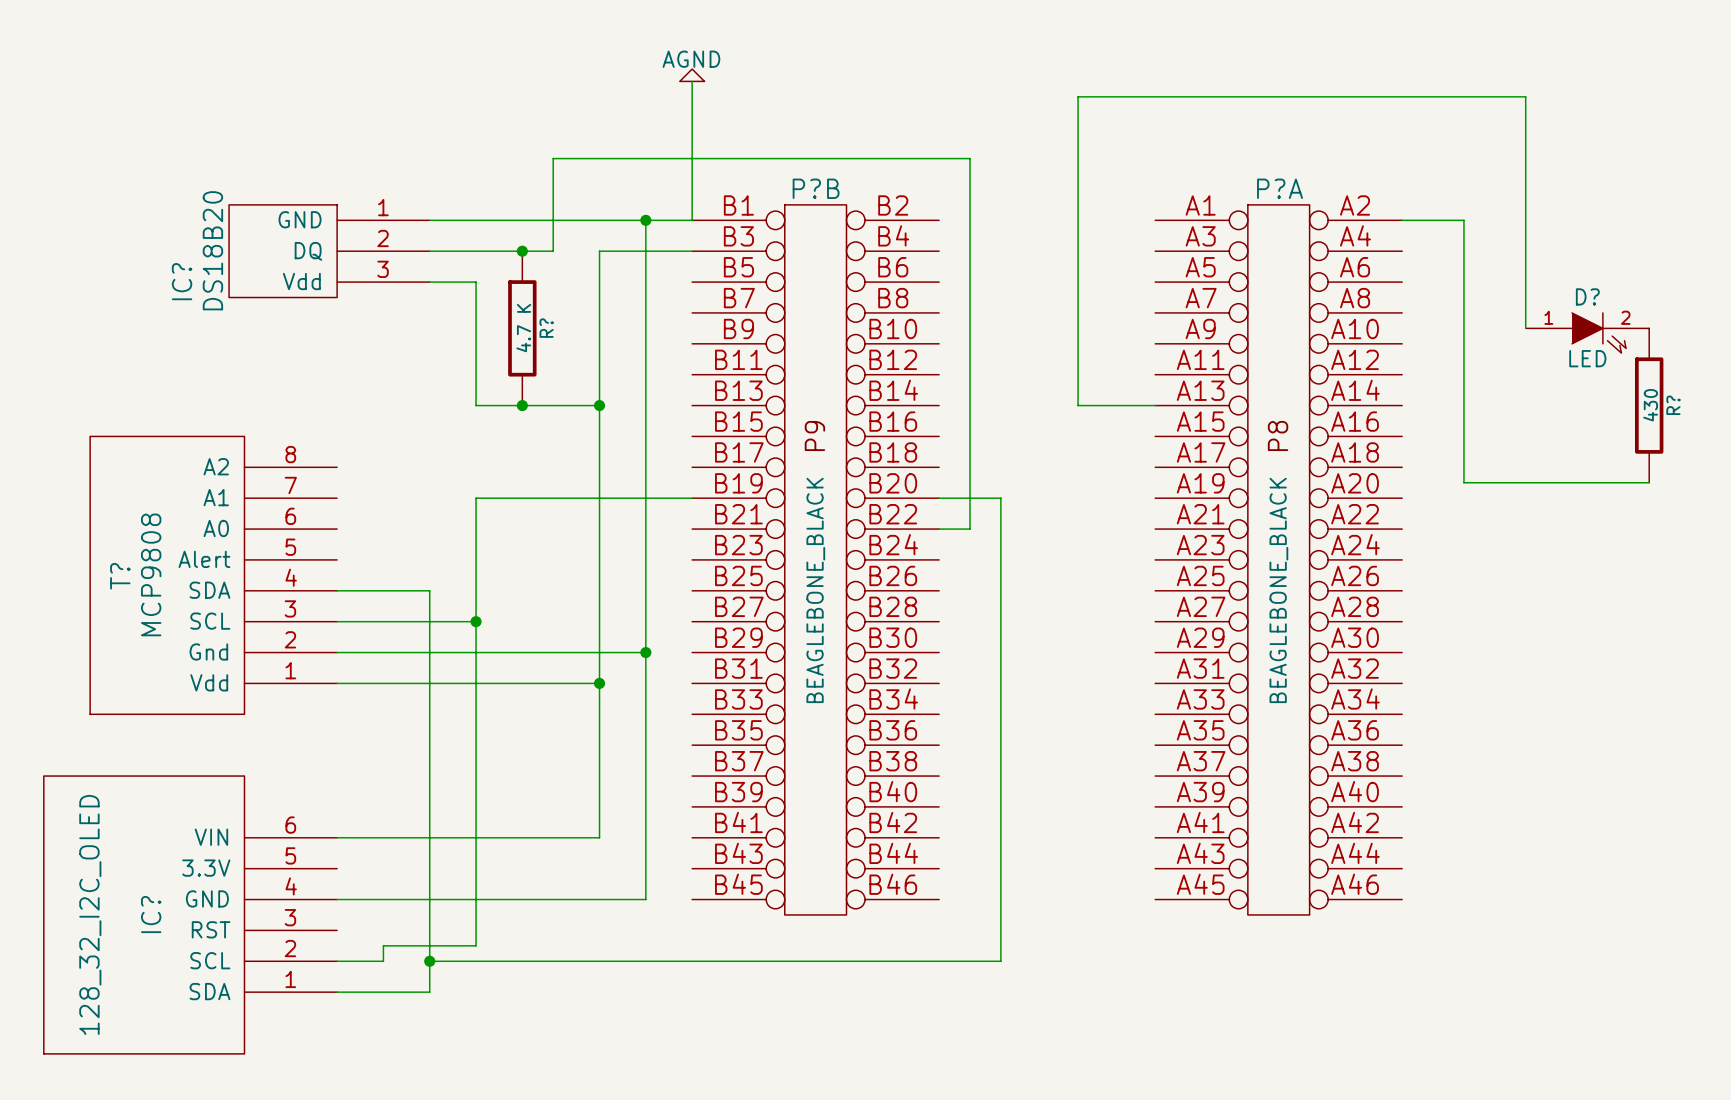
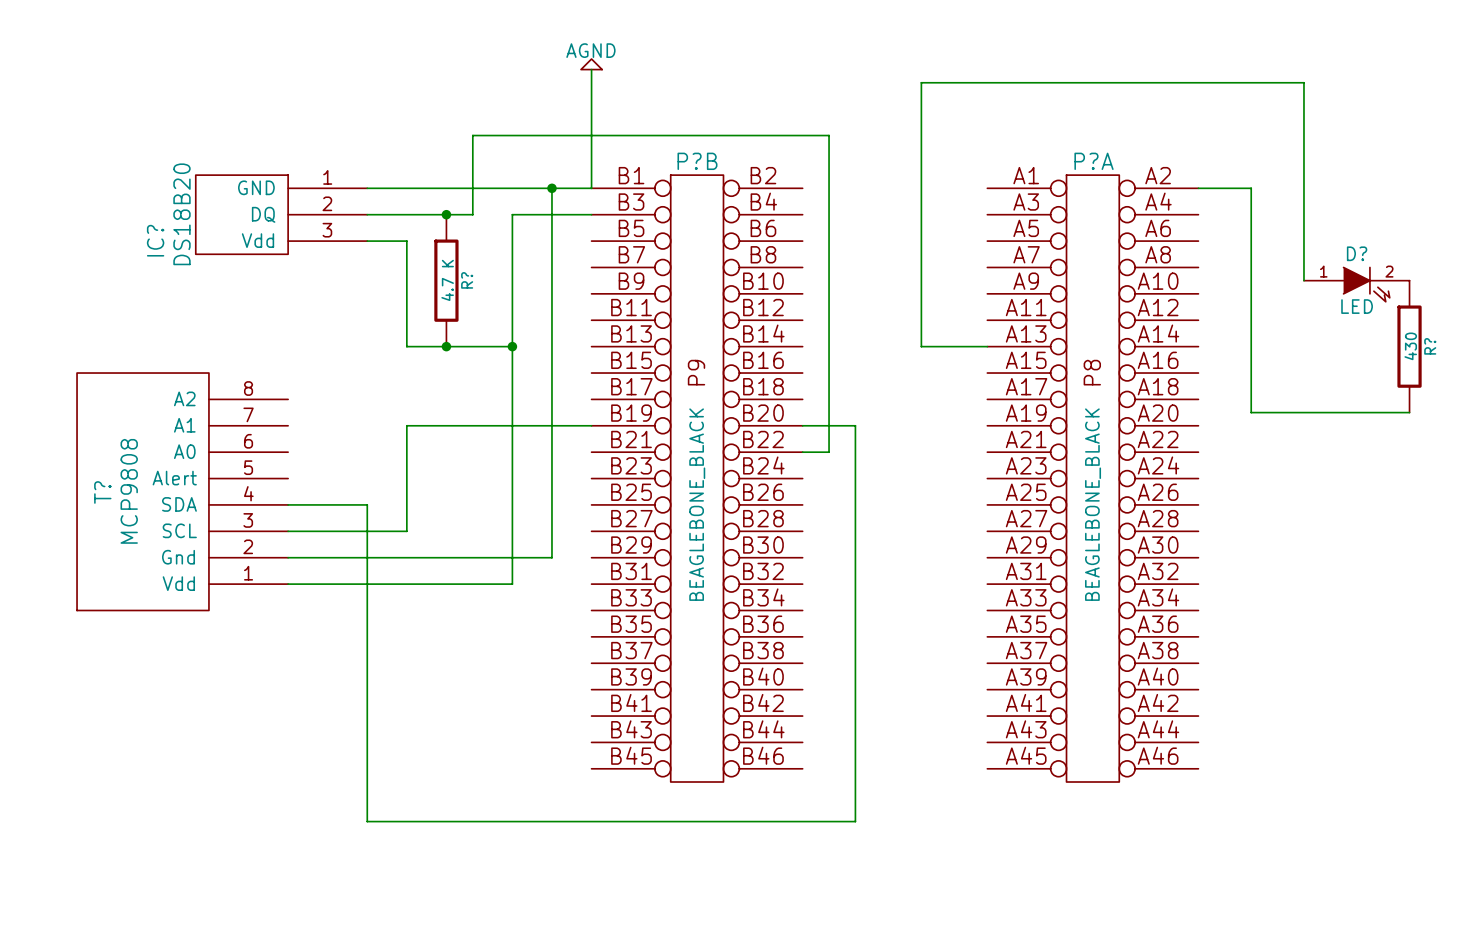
wire: (476, 621) (476, 945) (383, 945) (383, 961) (337, 961) -> none
junction: (476, 621) -> none
wire: (645, 652) (645, 899) (337, 899) -> none
junction: (645, 652) -> none
wire: (599, 683) (599, 837) (337, 837) -> none
junction: (599, 683) -> none
IC?: 128_32_I2C_OLED (190, 914) -> none
wire: (429, 961) (429, 992) (337, 992) -> none
junction: (429, 961) -> none

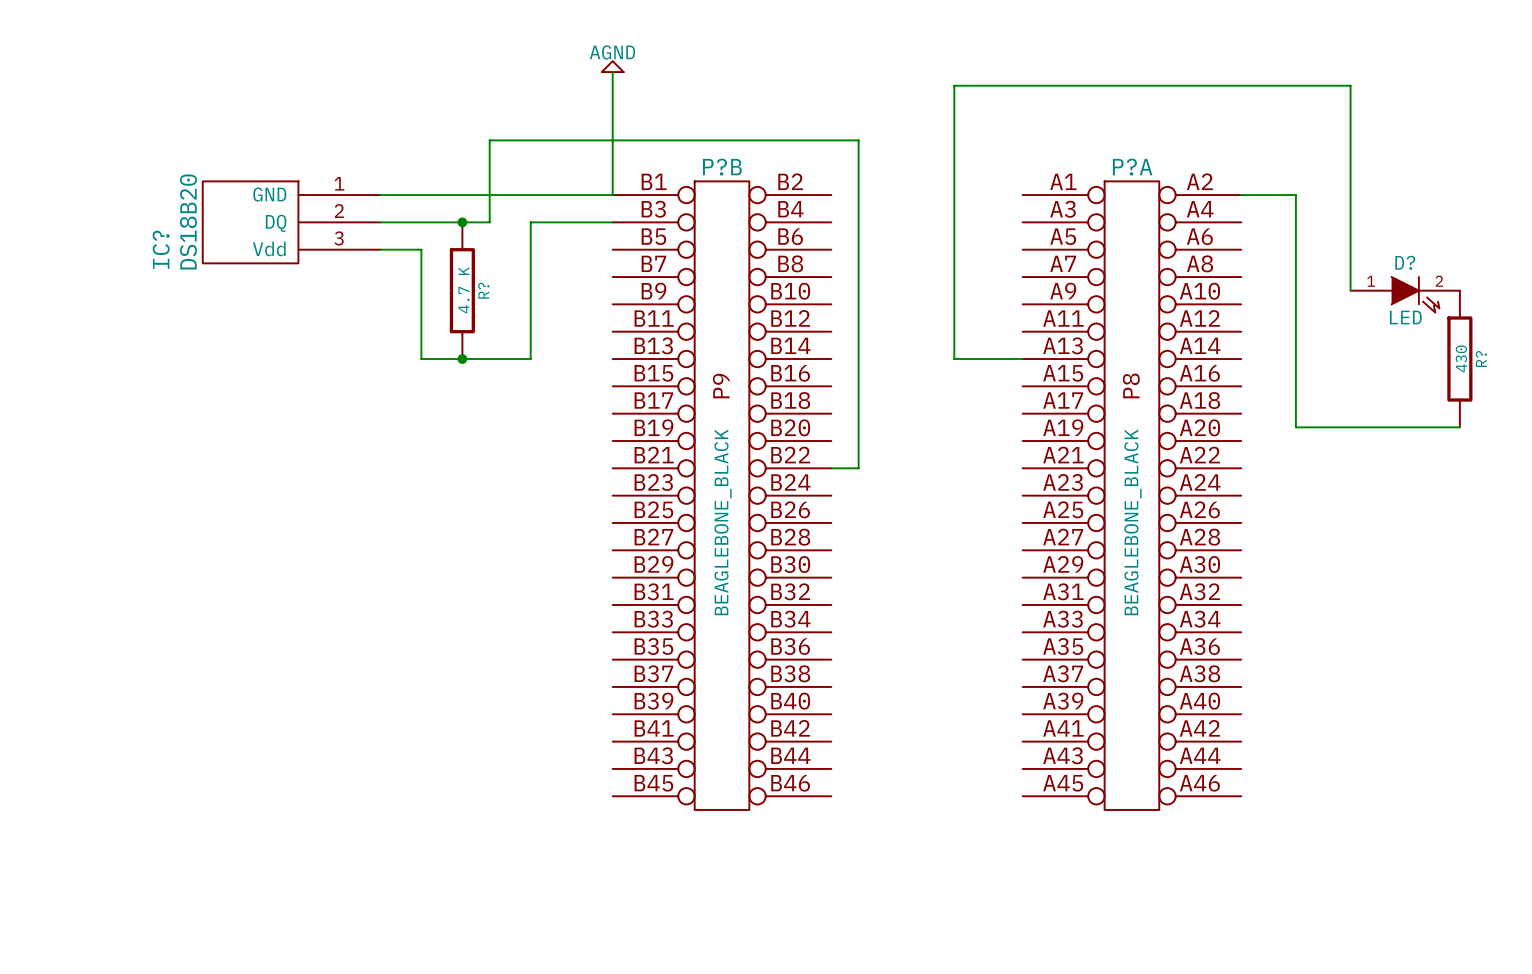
wire: (551, 188) (551, 557) (288, 557) -> none
junction: (551, 188) -> none
wire: (512, 346) (512, 584) (288, 584) -> none
junction: (512, 346) -> none
wire: (591, 425) (406, 425) (406, 531) (288, 531) -> none
wire: (802, 425) (855, 425) (855, 821) (367, 821) (367, 504) (288, 504) -> none
T?: MCP9808 (182, 491) -> none

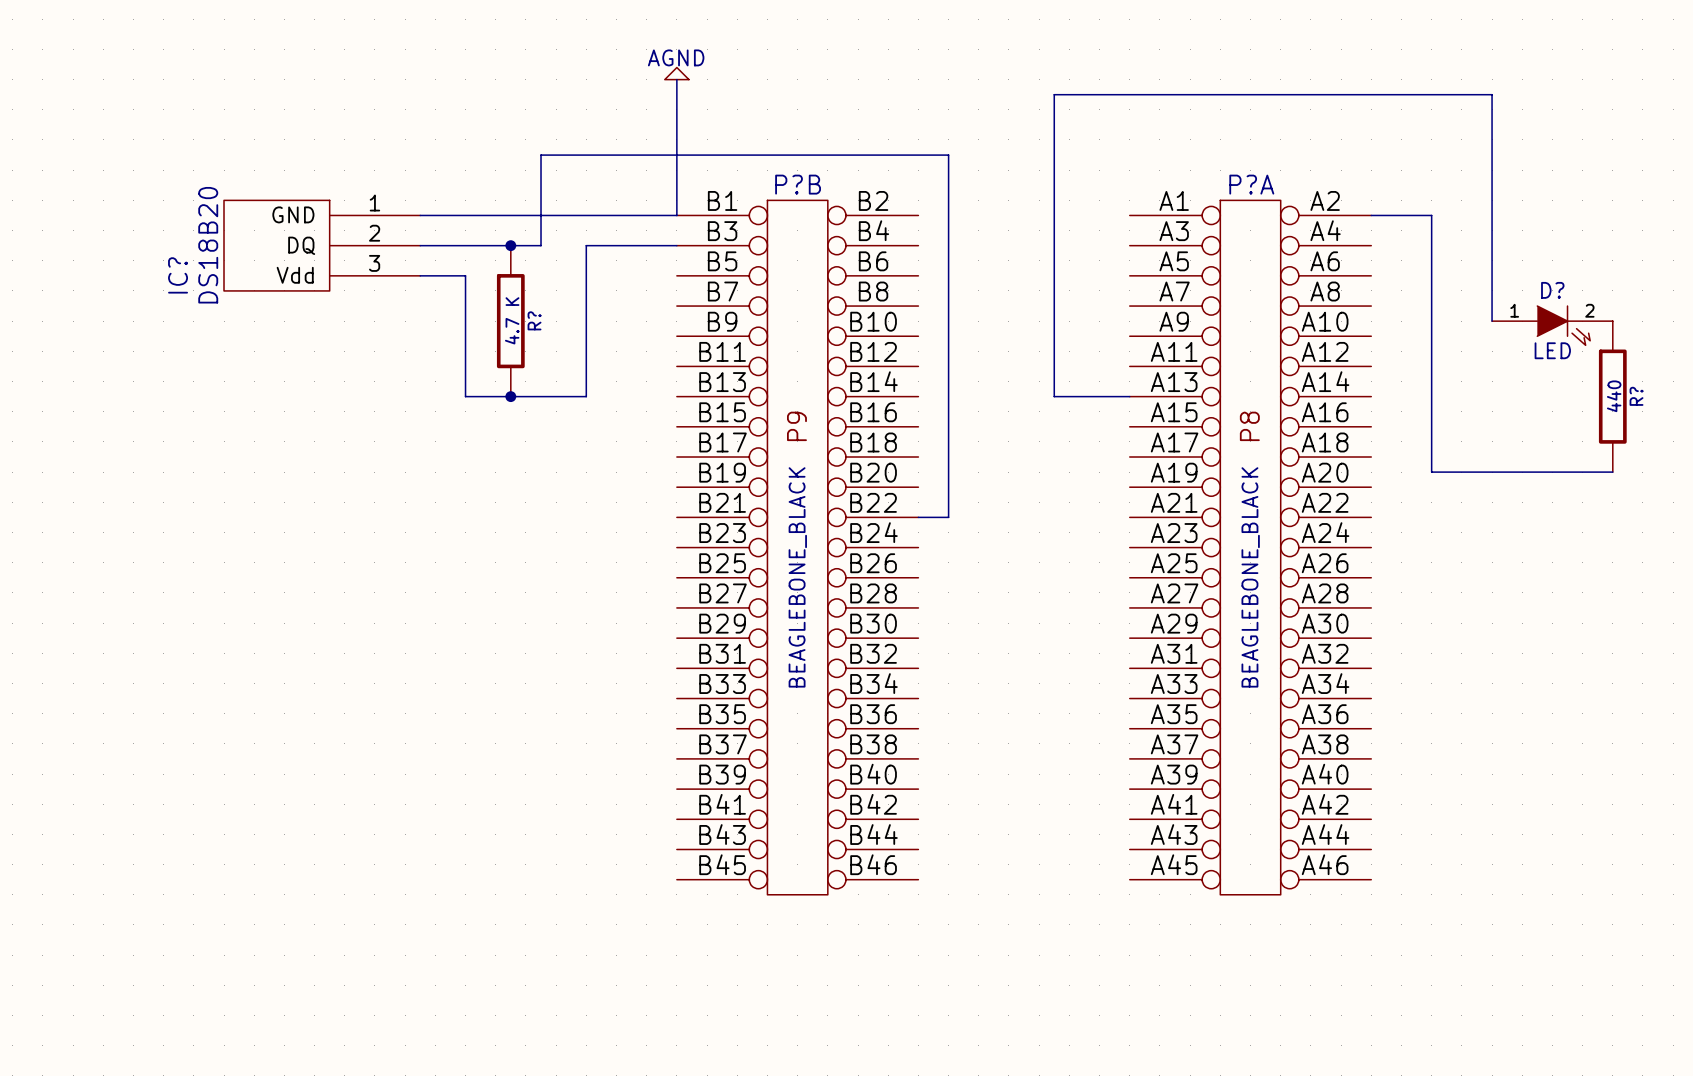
R? value: 430 (1461, 358) -> 440 (1614, 396)

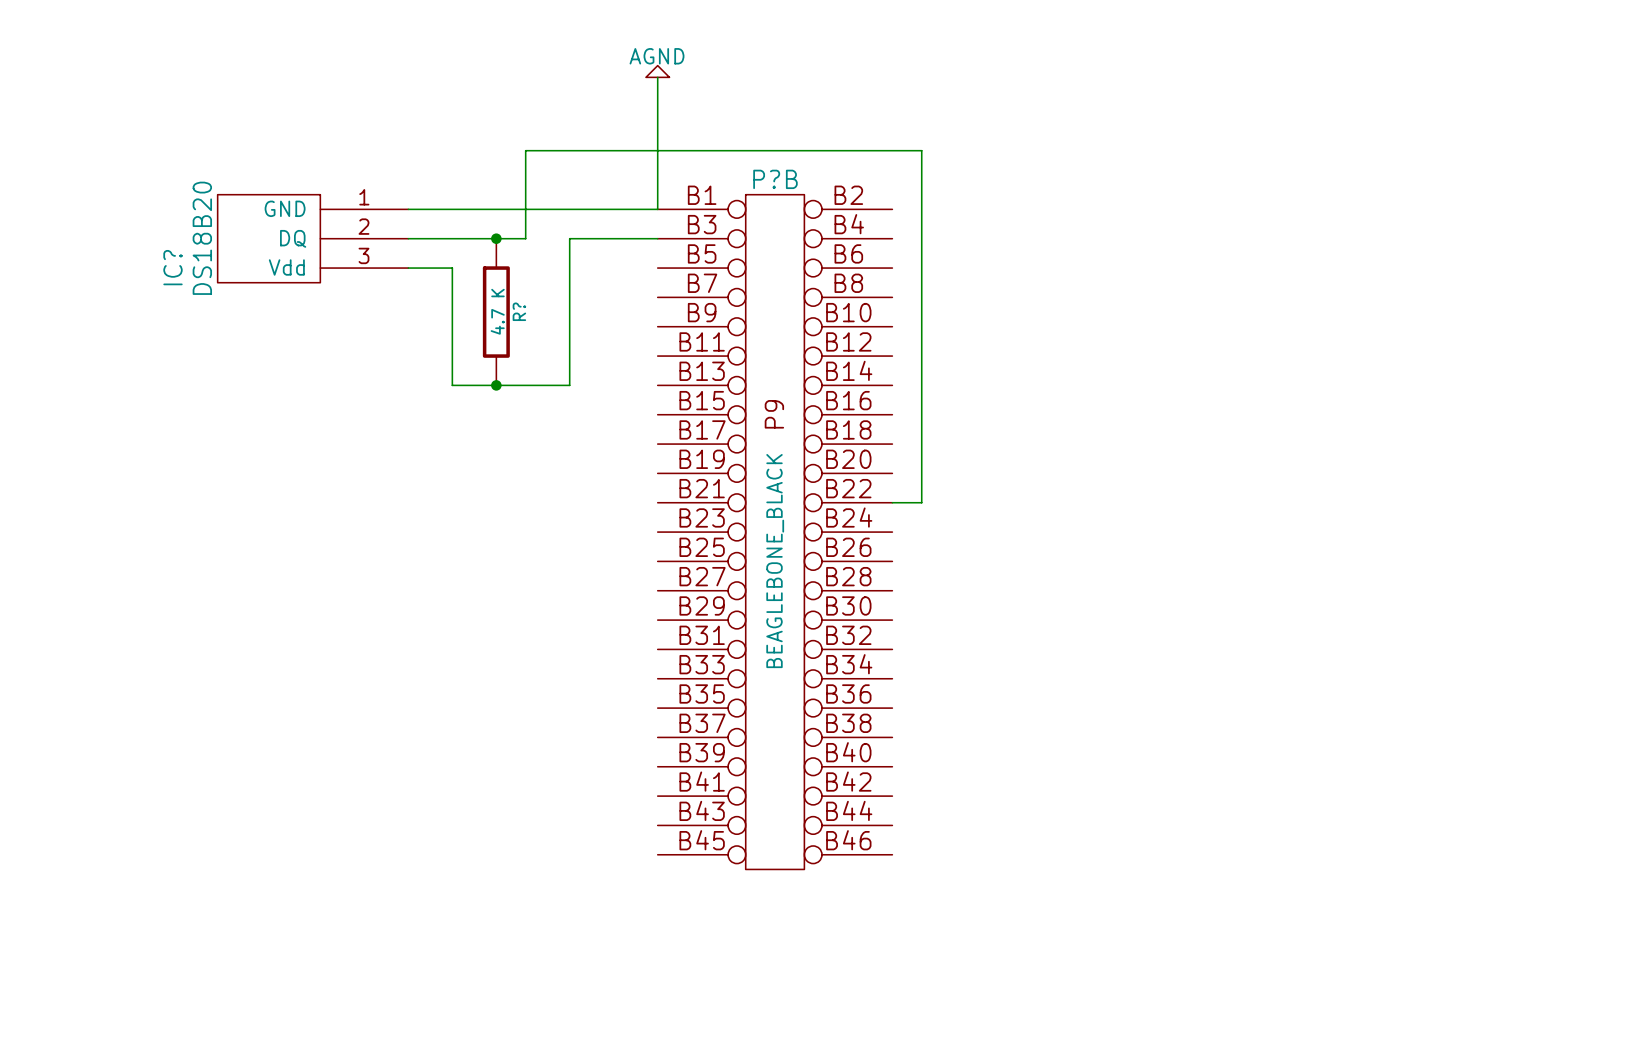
wire: (1371, 215) (1431, 215) (1431, 472) (1612, 472) -> none
wire: (1492, 321) (1492, 94) (1054, 94) (1054, 396) (1129, 396) -> none
D?: LED (1552, 325) -> none
R?: 440 (1612, 396) -> none
P?A: BEAGLEBONE_BLACK (1250, 547) -> none

